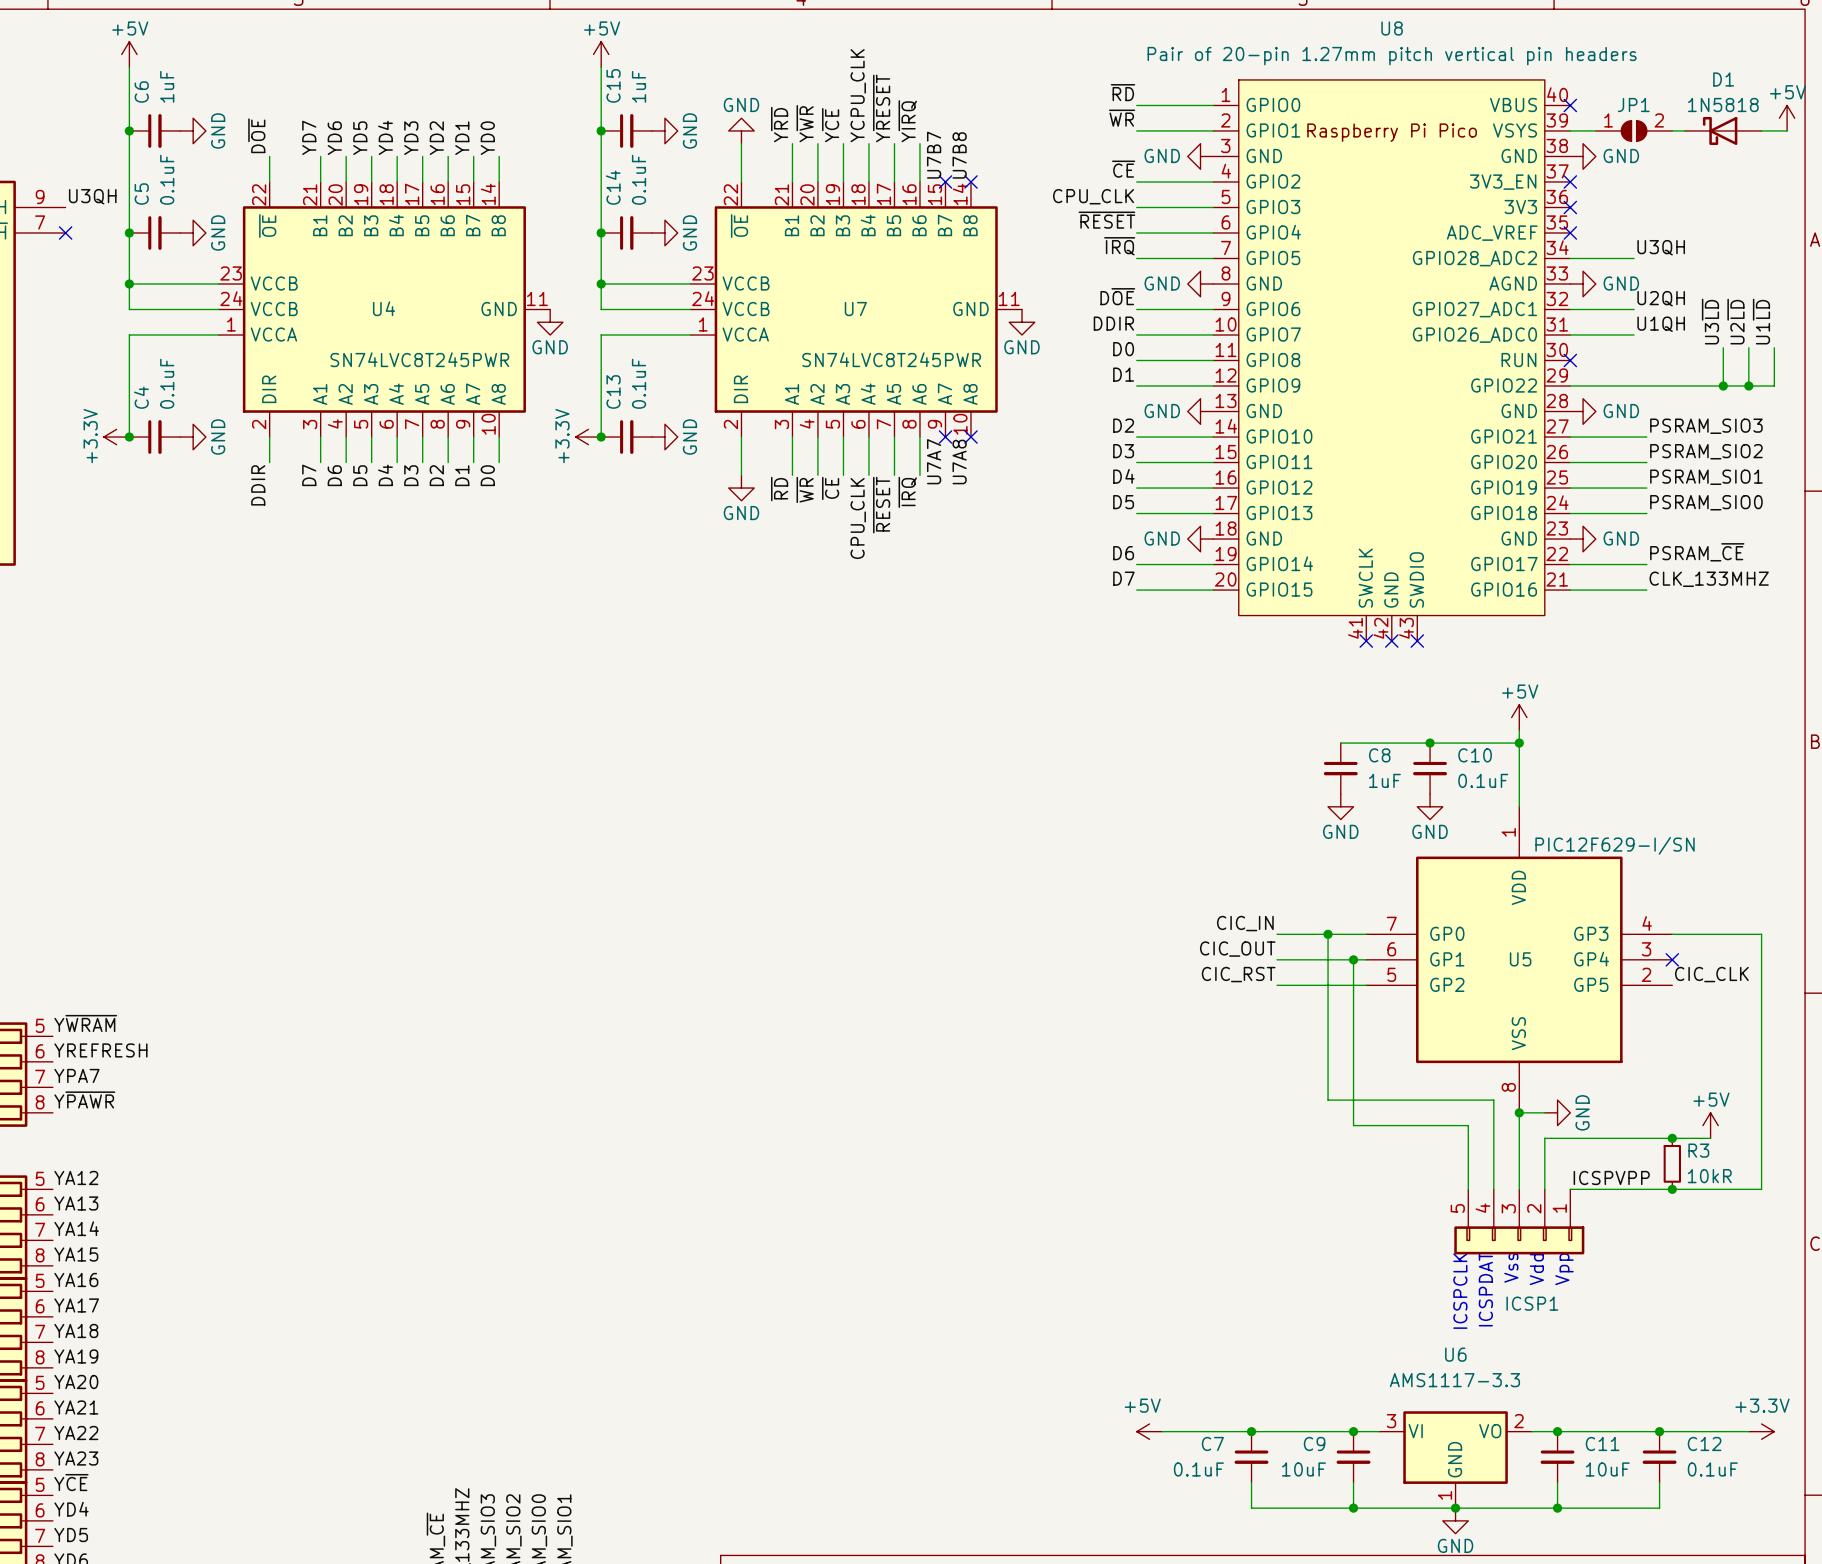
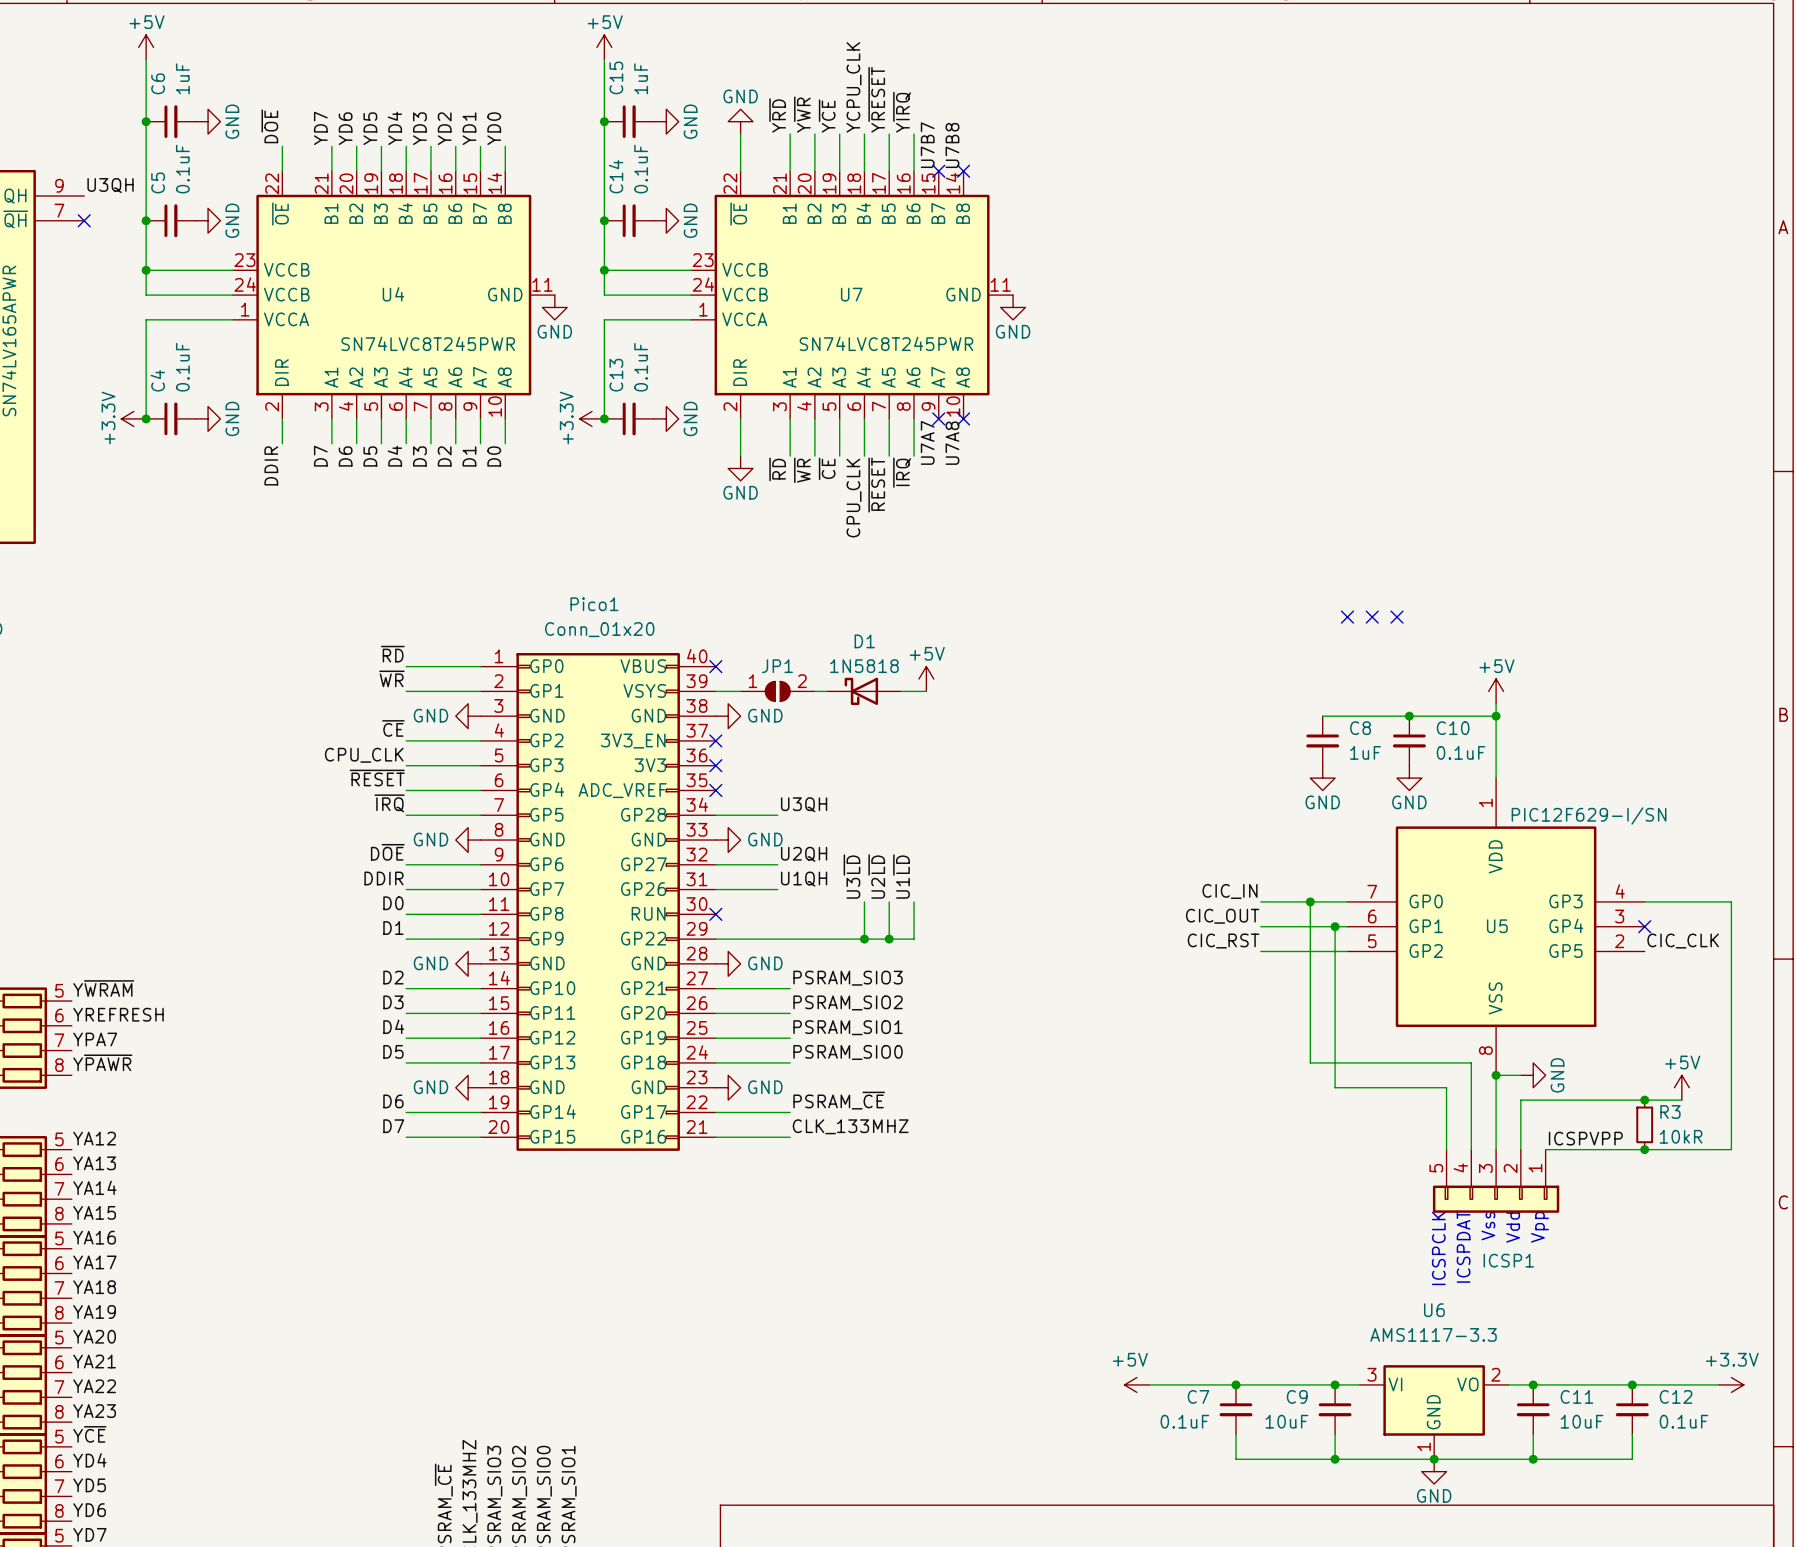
label: ~{RD} (1123, 92) -> none
wire: (1136, 105) (1213, 105) -> none
no-connect mark: (1570, 105) -> none
label: ~{WR} (1122, 118) -> none
power symbol: +5V (1787, 118) -> none
wire: (1136, 130) (1213, 130) -> none
wire: (1570, 130) (1595, 130) -> none
JP1 position: (1634, 130) -> (777, 691)
wire: (1672, 130) (1685, 130) -> none
D1 position: (1723, 130) -> (864, 691)
wire: (1761, 130) (1787, 130) -> none
power symbol: GND (1200, 156) -> none
power symbol: GND (1583, 156) -> none
label: ~{CE} (1123, 169) -> none
wire: (1136, 181) (1213, 181) -> none
no-connect mark: (1570, 181) -> none
label: CPU_CLK (1093, 196) -> none
wire: (1136, 207) (1213, 207) -> none
no-connect mark: (1570, 207) -> none
label: ~{RESET} (1106, 220) -> none
wire: (1136, 232) (1213, 232) -> none
no-connect mark: (1570, 232) -> none
label: ~{IRQ} (1119, 246) -> none
label: U3QH (1661, 247) -> none
wire: (1136, 258) (1213, 258) -> none
wire: (1570, 258) (1634, 258) -> none
power symbol: GND (1200, 284) -> none
power symbol: GND (1583, 284) -> none
label: D~{OE} (1117, 296) -> none
label: U2QH (1661, 298) -> none
wire: (1136, 309) (1213, 309) -> none
wire: (1570, 309) (1634, 309) -> none
label: U3~{LD} (1710, 321) -> none
label: U2~{LD} (1735, 321) -> none
label: U1~{LD} (1761, 321) -> none
label: DDIR (1113, 323) -> none
label: U1QH (1661, 324) -> none
wire: (1136, 335) (1213, 335) -> none
wire: (1570, 335) (1634, 335) -> none
wire: (1723, 347) (1723, 386) -> none
wire: (1748, 347) (1748, 386) -> none
wire: (1774, 347) (1774, 386) (1570, 386) -> none
label: D0 (1123, 349) -> none
wire: (1136, 360) (1213, 360) -> none
U8: Pair of 20-pin 1.27mm pitch vertical pin headers (1391, 360) -> none
no-connect mark: (1570, 360) -> none
label: D1 (1123, 374) -> none
wire: (1136, 386) (1213, 386) -> none
junction: (1723, 386) -> none
junction: (1748, 386) -> none
power symbol: GND (1200, 411) -> none
power symbol: GND (1583, 411) -> none
label: D2 (1123, 425) -> none
label: PSRAM_SIO3 (1706, 426) -> none
wire: (1136, 437) (1213, 437) -> none
wire: (1570, 437) (1646, 437) -> none
label: D3 (1123, 451) -> none
label: PSRAM_SIO2 (1706, 451) -> none
wire: (1136, 462) (1213, 462) -> none
wire: (1570, 462) (1646, 462) -> none
label: D4 (1123, 476) -> none
label: PSRAM_SIO1 (1706, 477) -> none
wire: (1136, 488) (1213, 488) -> none
wire: (1570, 488) (1646, 488) -> none
label: D5 (1123, 502) -> none
label: PSRAM_SIO0 (1706, 502) -> none
wire: (1136, 513) (1213, 513) -> none
wire: (1570, 513) (1646, 513) -> none
power symbol: GND (1200, 539) -> none
power symbol: GND (1583, 539) -> none
label: PSRAM_~{CE} (1697, 552) -> none
label: D6 (1123, 553) -> none
wire: (1136, 564) (1213, 564) -> none
wire: (1570, 564) (1646, 564) -> none
label: D7 (1123, 578) -> none
label: CLK_133MHZ (1709, 579) -> none
wire: (1136, 590) (1213, 590) -> none
wire: (1570, 590) (1646, 590) -> none
label: none -> ~{RD} (392, 654)
wire: none -> (406, 666) (480, 666)
no-connect mark: none -> (715, 666)
label: none -> ~{WR} (391, 678)
power symbol: none -> +5V (926, 679)
wire: none -> (406, 691) (480, 691)
wire: none -> (715, 691) (740, 691)
wire: none -> (814, 691) (827, 691)
wire: none -> (901, 691) (926, 691)
power symbol: none -> GND (468, 716)
power symbol: none -> GND (728, 716)
label: none -> ~{CE} (393, 728)
wire: none -> (406, 740) (480, 740)
no-connect mark: none -> (715, 740)
label: none -> CPU_CLK (364, 755)
wire: none -> (406, 765) (480, 765)
no-connect mark: none -> (715, 765)
label: none -> ~{RESET} (377, 778)
wire: none -> (406, 790) (480, 790)
no-connect mark: none -> (715, 790)
label: none -> ~{IRQ} (389, 803)
label: none -> U3QH (804, 804)
wire: none -> (406, 815) (480, 815)
wire: none -> (715, 815) (777, 815)
power symbol: none -> GND (468, 840)
power symbol: none -> GND (728, 840)
label: none -> D~{OE} (387, 852)
label: none -> U2QH (804, 854)
wire: none -> (406, 864) (480, 864)
wire: none -> (715, 864) (777, 864)
label: none -> U3~{LD} (851, 876)
label: none -> U2~{LD} (876, 876)
label: none -> U1~{LD} (901, 876)
label: none -> DDIR (384, 878)
label: none -> U1QH (804, 879)
wire: none -> (406, 889) (480, 889)
wire: none -> (715, 889) (777, 889)
Pico1: none -> Conn_01x20 (598, 901)
wire: none -> (864, 901) (864, 939)
wire: none -> (889, 901) (889, 939)
wire: none -> (913, 901) (913, 939) (715, 939)
label: none -> D0 (393, 903)
wire: none -> (406, 914) (480, 914)
no-connect mark: none -> (715, 914)
label: none -> D1 (393, 928)
wire: none -> (406, 939) (480, 939)
junction: none -> (864, 939)
junction: none -> (889, 939)
power symbol: none -> GND (468, 963)
power symbol: none -> GND (728, 963)
label: none -> D2 (393, 977)
label: none -> PSRAM_SIO3 (848, 978)
wire: none -> (406, 988) (480, 988)
wire: none -> (715, 988) (790, 988)
label: none -> D3 (393, 1002)
label: none -> PSRAM_SIO2 (848, 1002)
wire: none -> (406, 1013) (480, 1013)
wire: none -> (715, 1013) (790, 1013)
label: none -> D4 (393, 1026)
label: none -> PSRAM_SIO1 (848, 1027)
wire: none -> (406, 1038) (480, 1038)
wire: none -> (715, 1038) (790, 1038)
label: none -> D5 (393, 1051)
label: none -> PSRAM_SIO0 (848, 1052)
wire: none -> (406, 1062) (480, 1062)
wire: none -> (715, 1062) (790, 1062)
power symbol: none -> GND (468, 1087)
power symbol: none -> GND (728, 1087)
label: none -> PSRAM_~{CE} (839, 1100)
label: none -> D6 (393, 1101)
wire: none -> (406, 1112) (480, 1112)
wire: none -> (715, 1112) (790, 1112)
label: none -> D7 (393, 1126)
label: none -> CLK_133MHZ (850, 1126)
wire: none -> (406, 1137) (480, 1137)
wire: none -> (715, 1137) (790, 1137)

